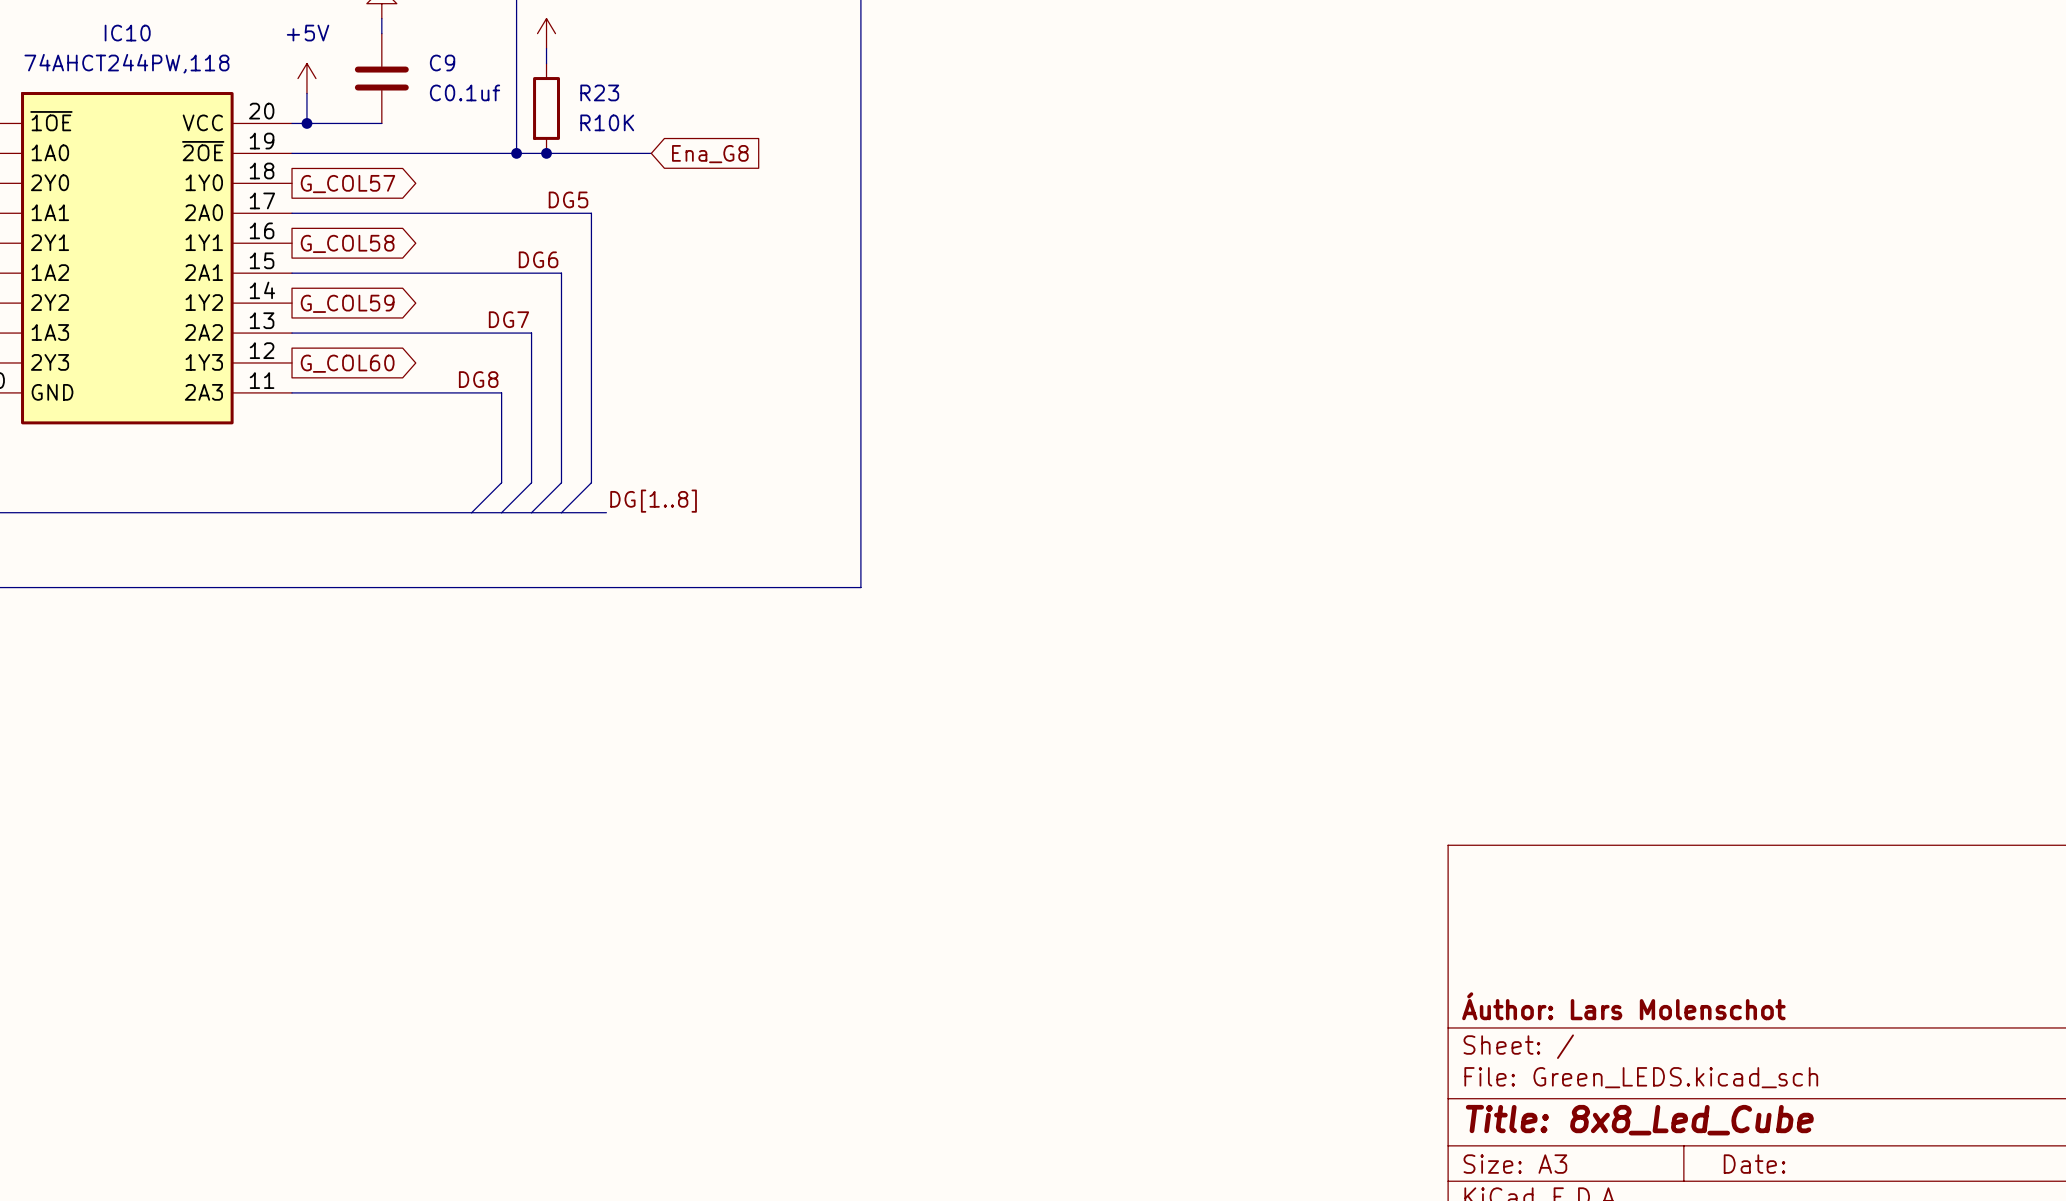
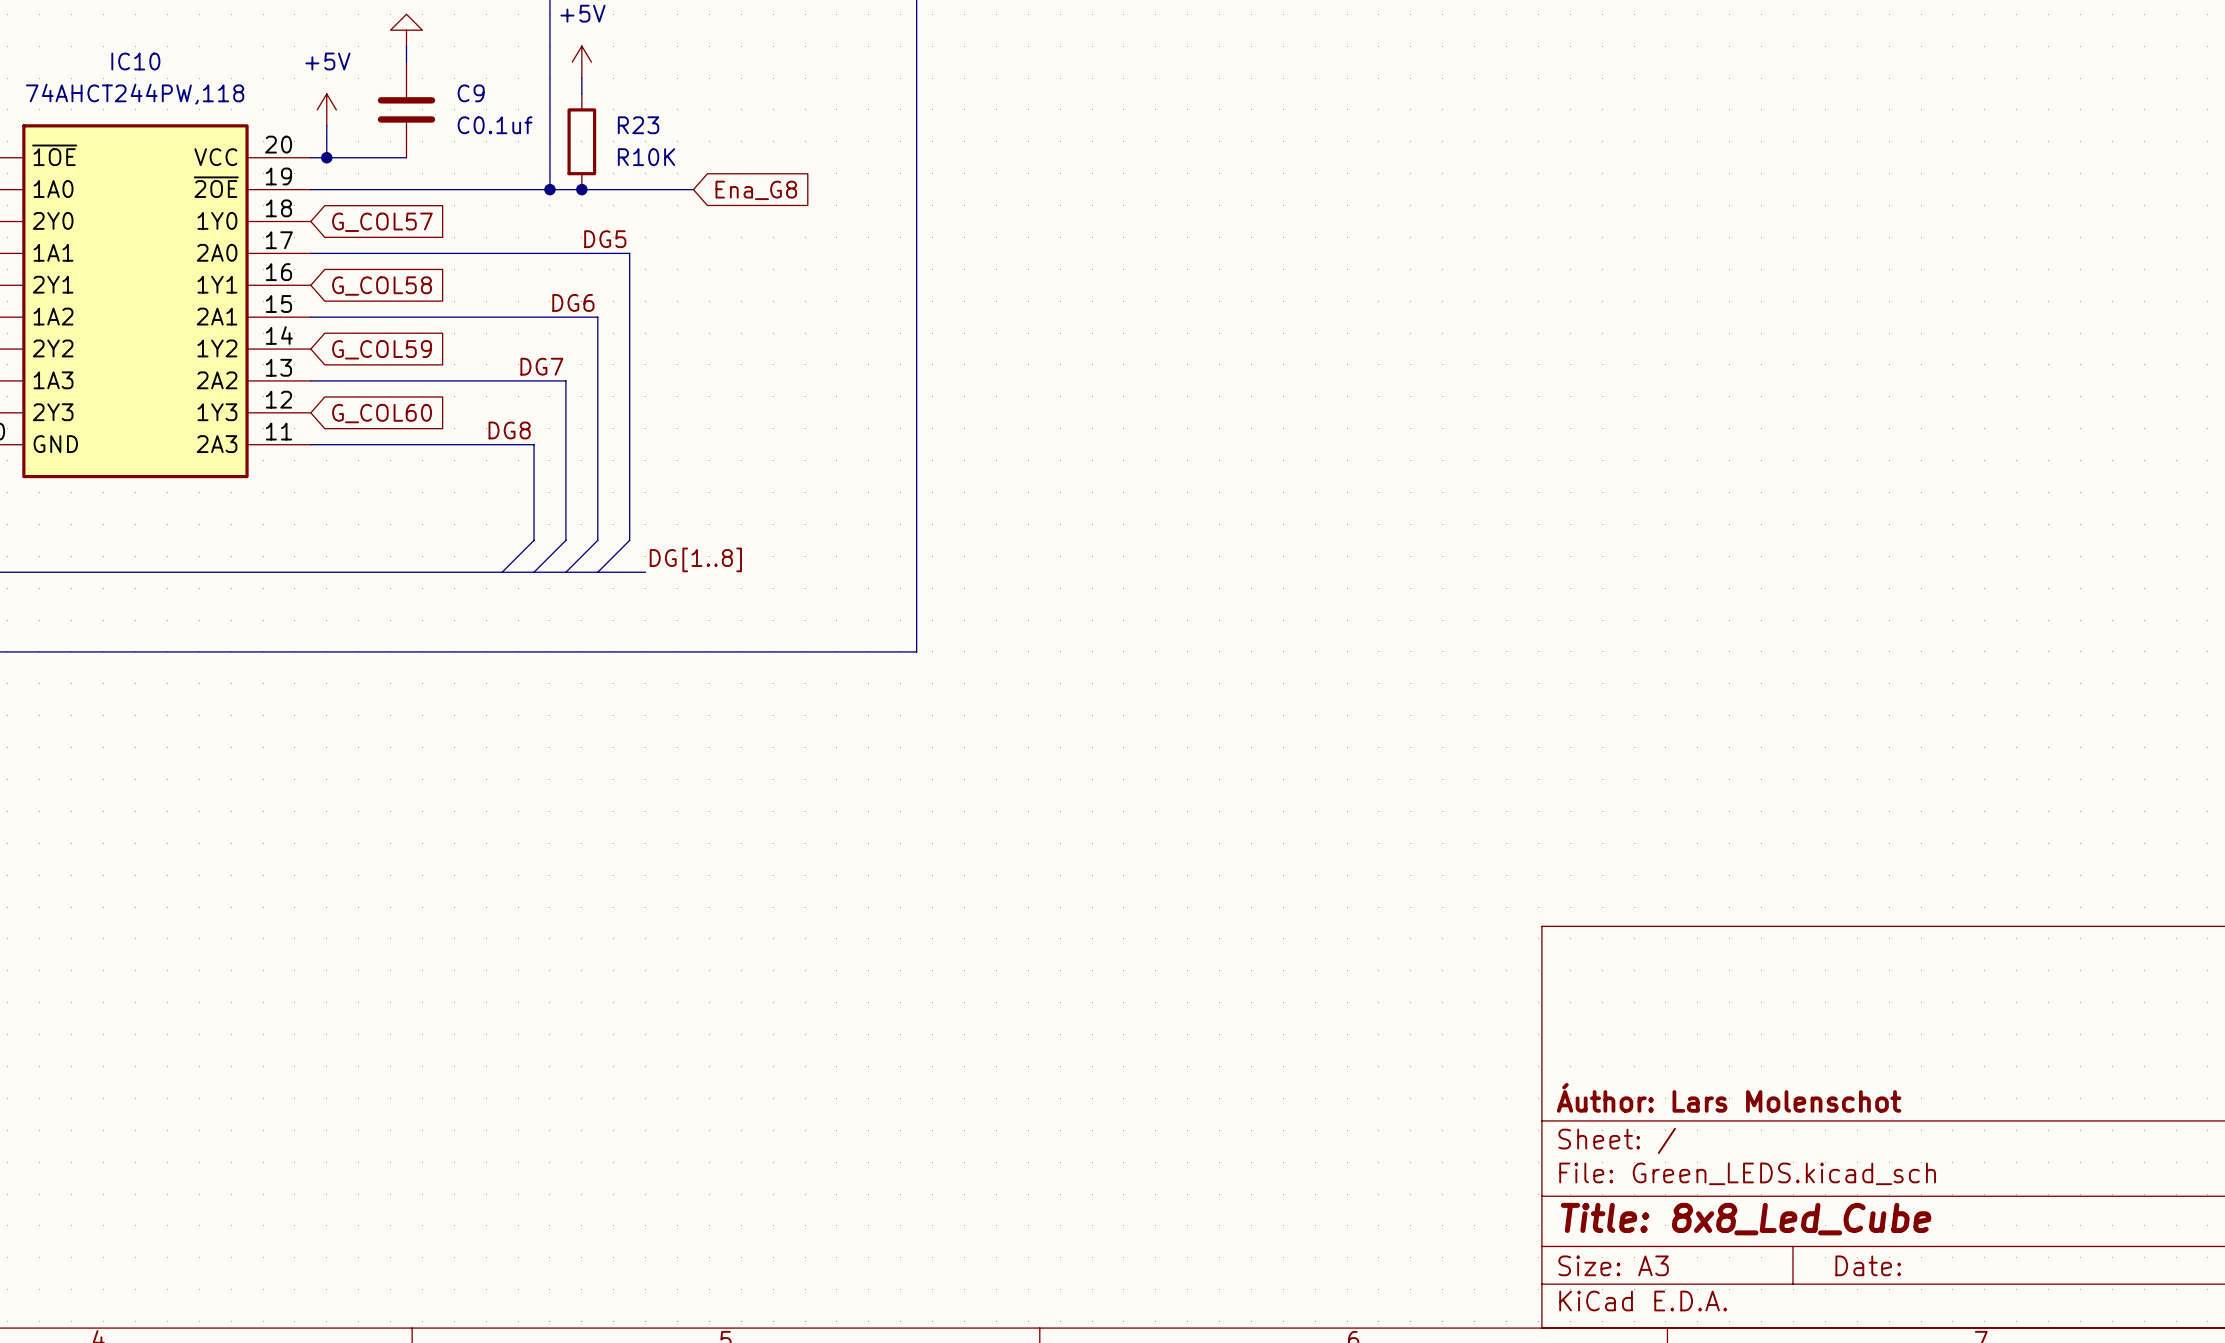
global label shape: output (347, 184) -> input (382, 222)
global label shape: output (347, 243) -> input (382, 286)
global label shape: output (347, 303) -> input (382, 349)
global label shape: output (347, 363) -> input (382, 413)

